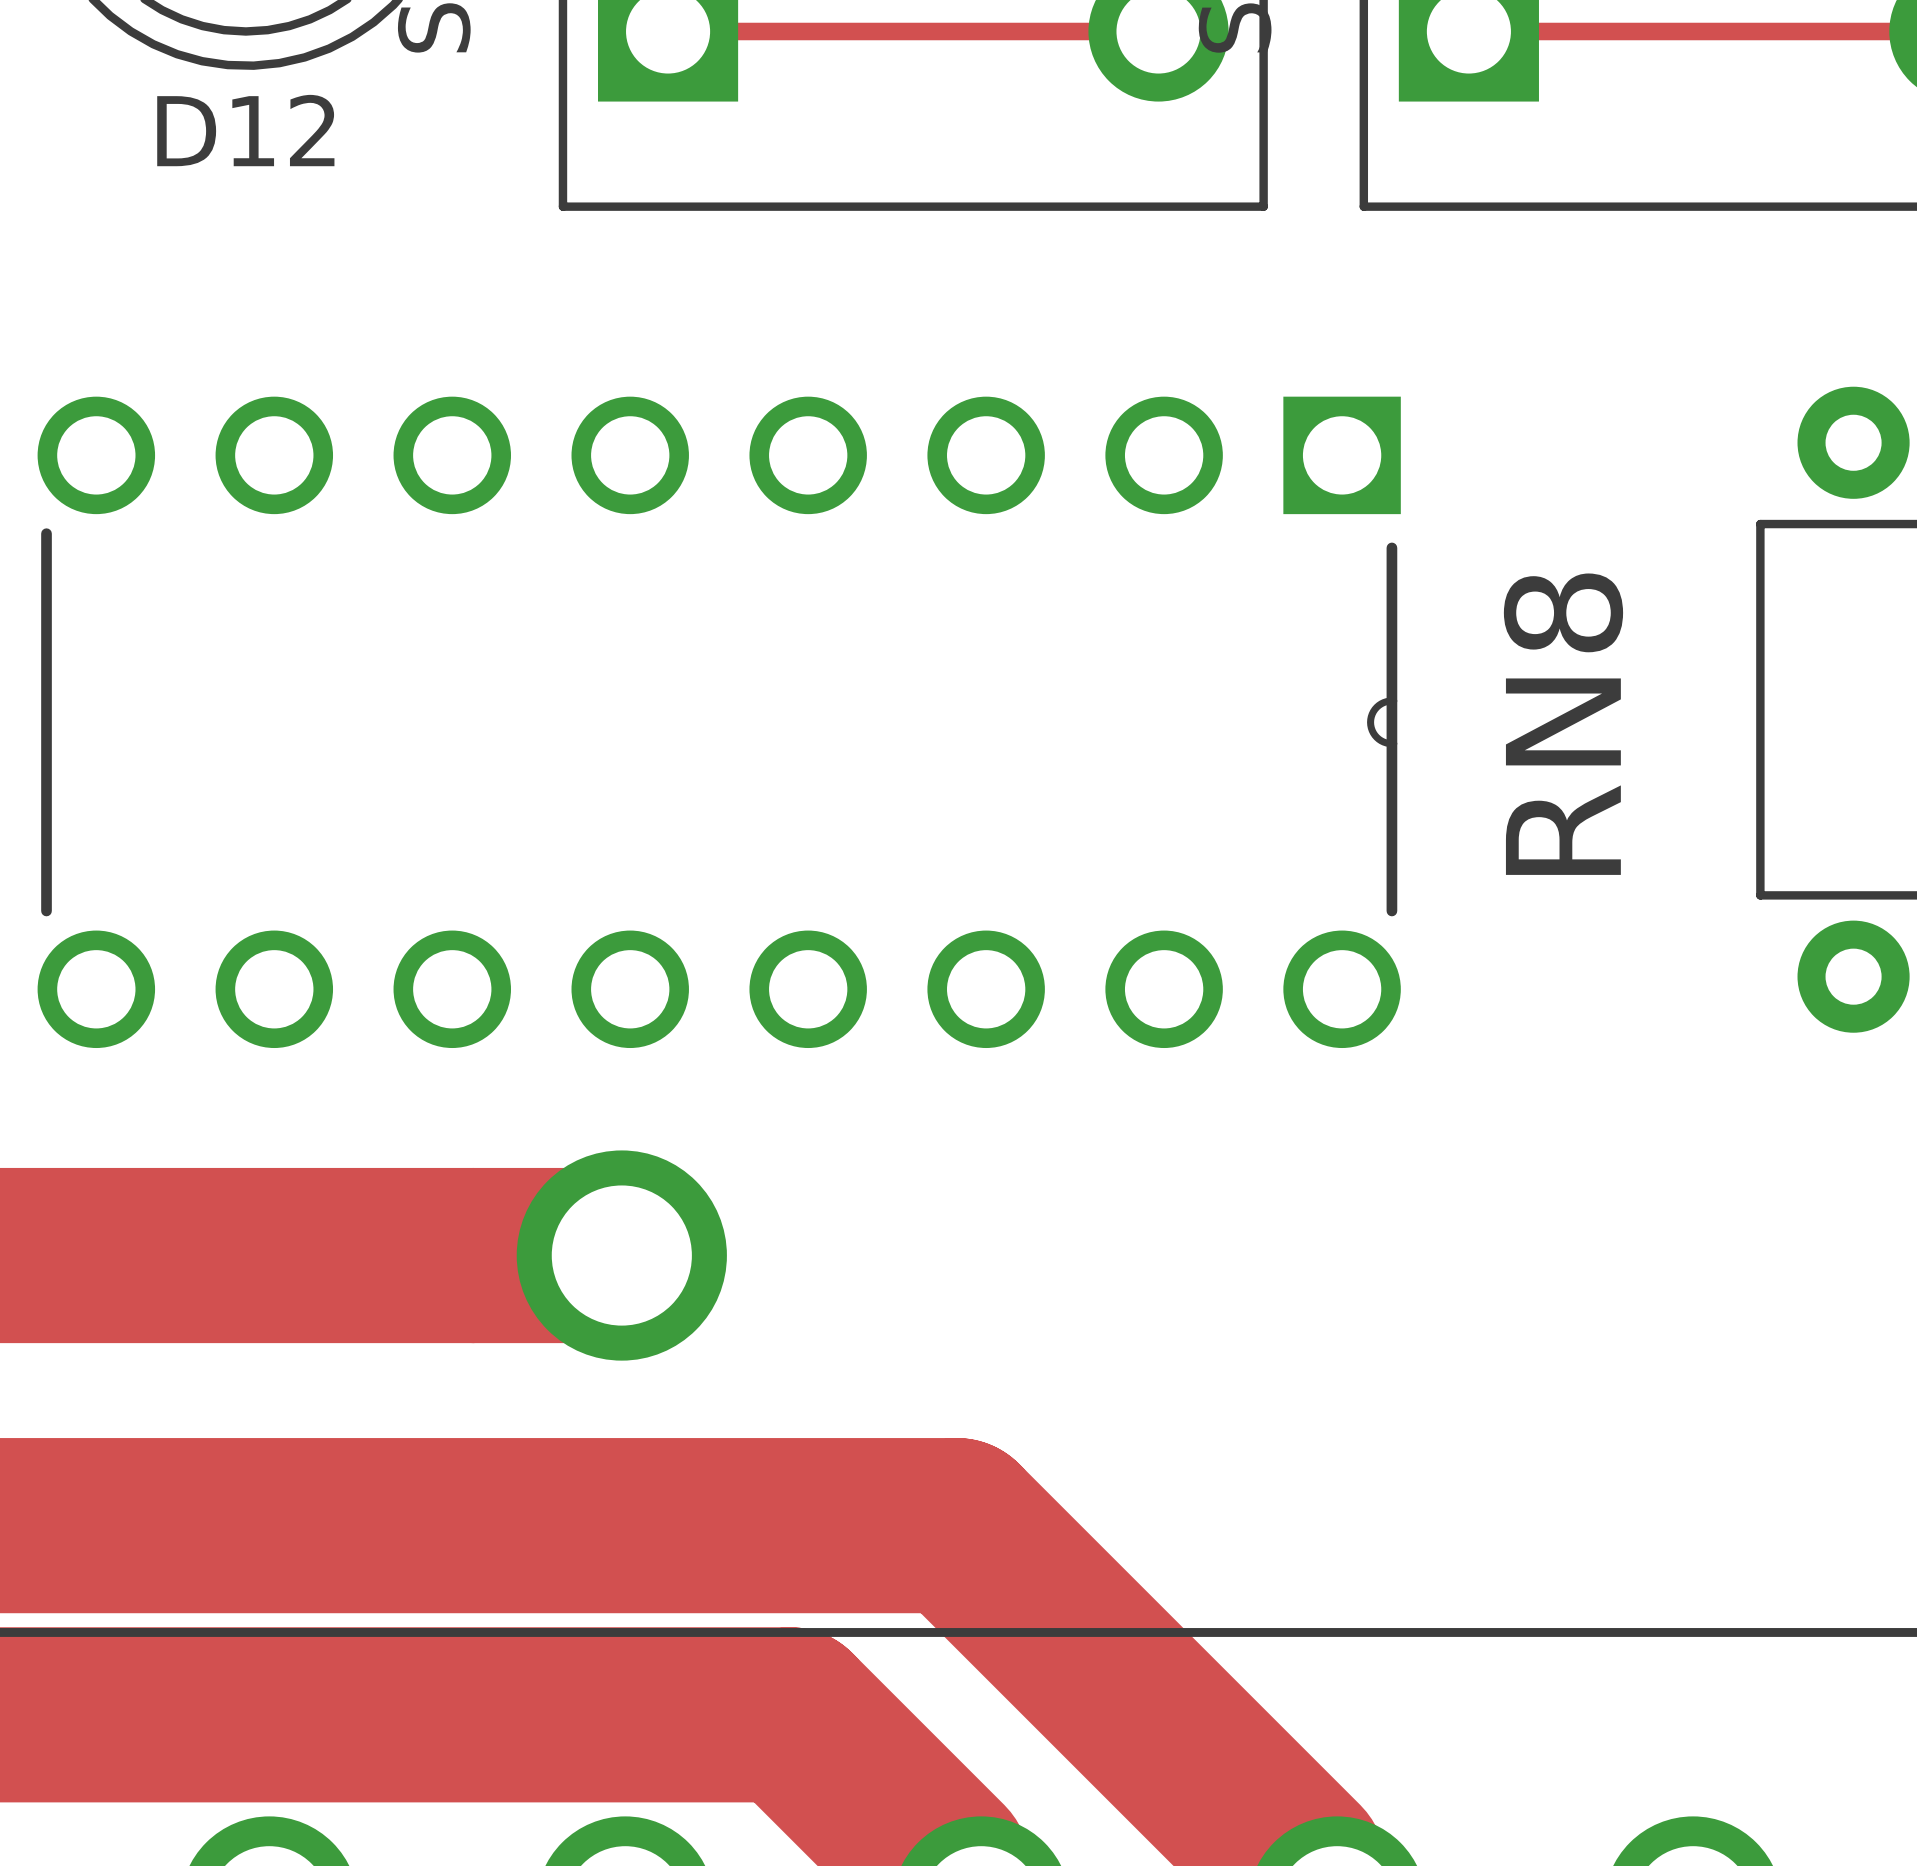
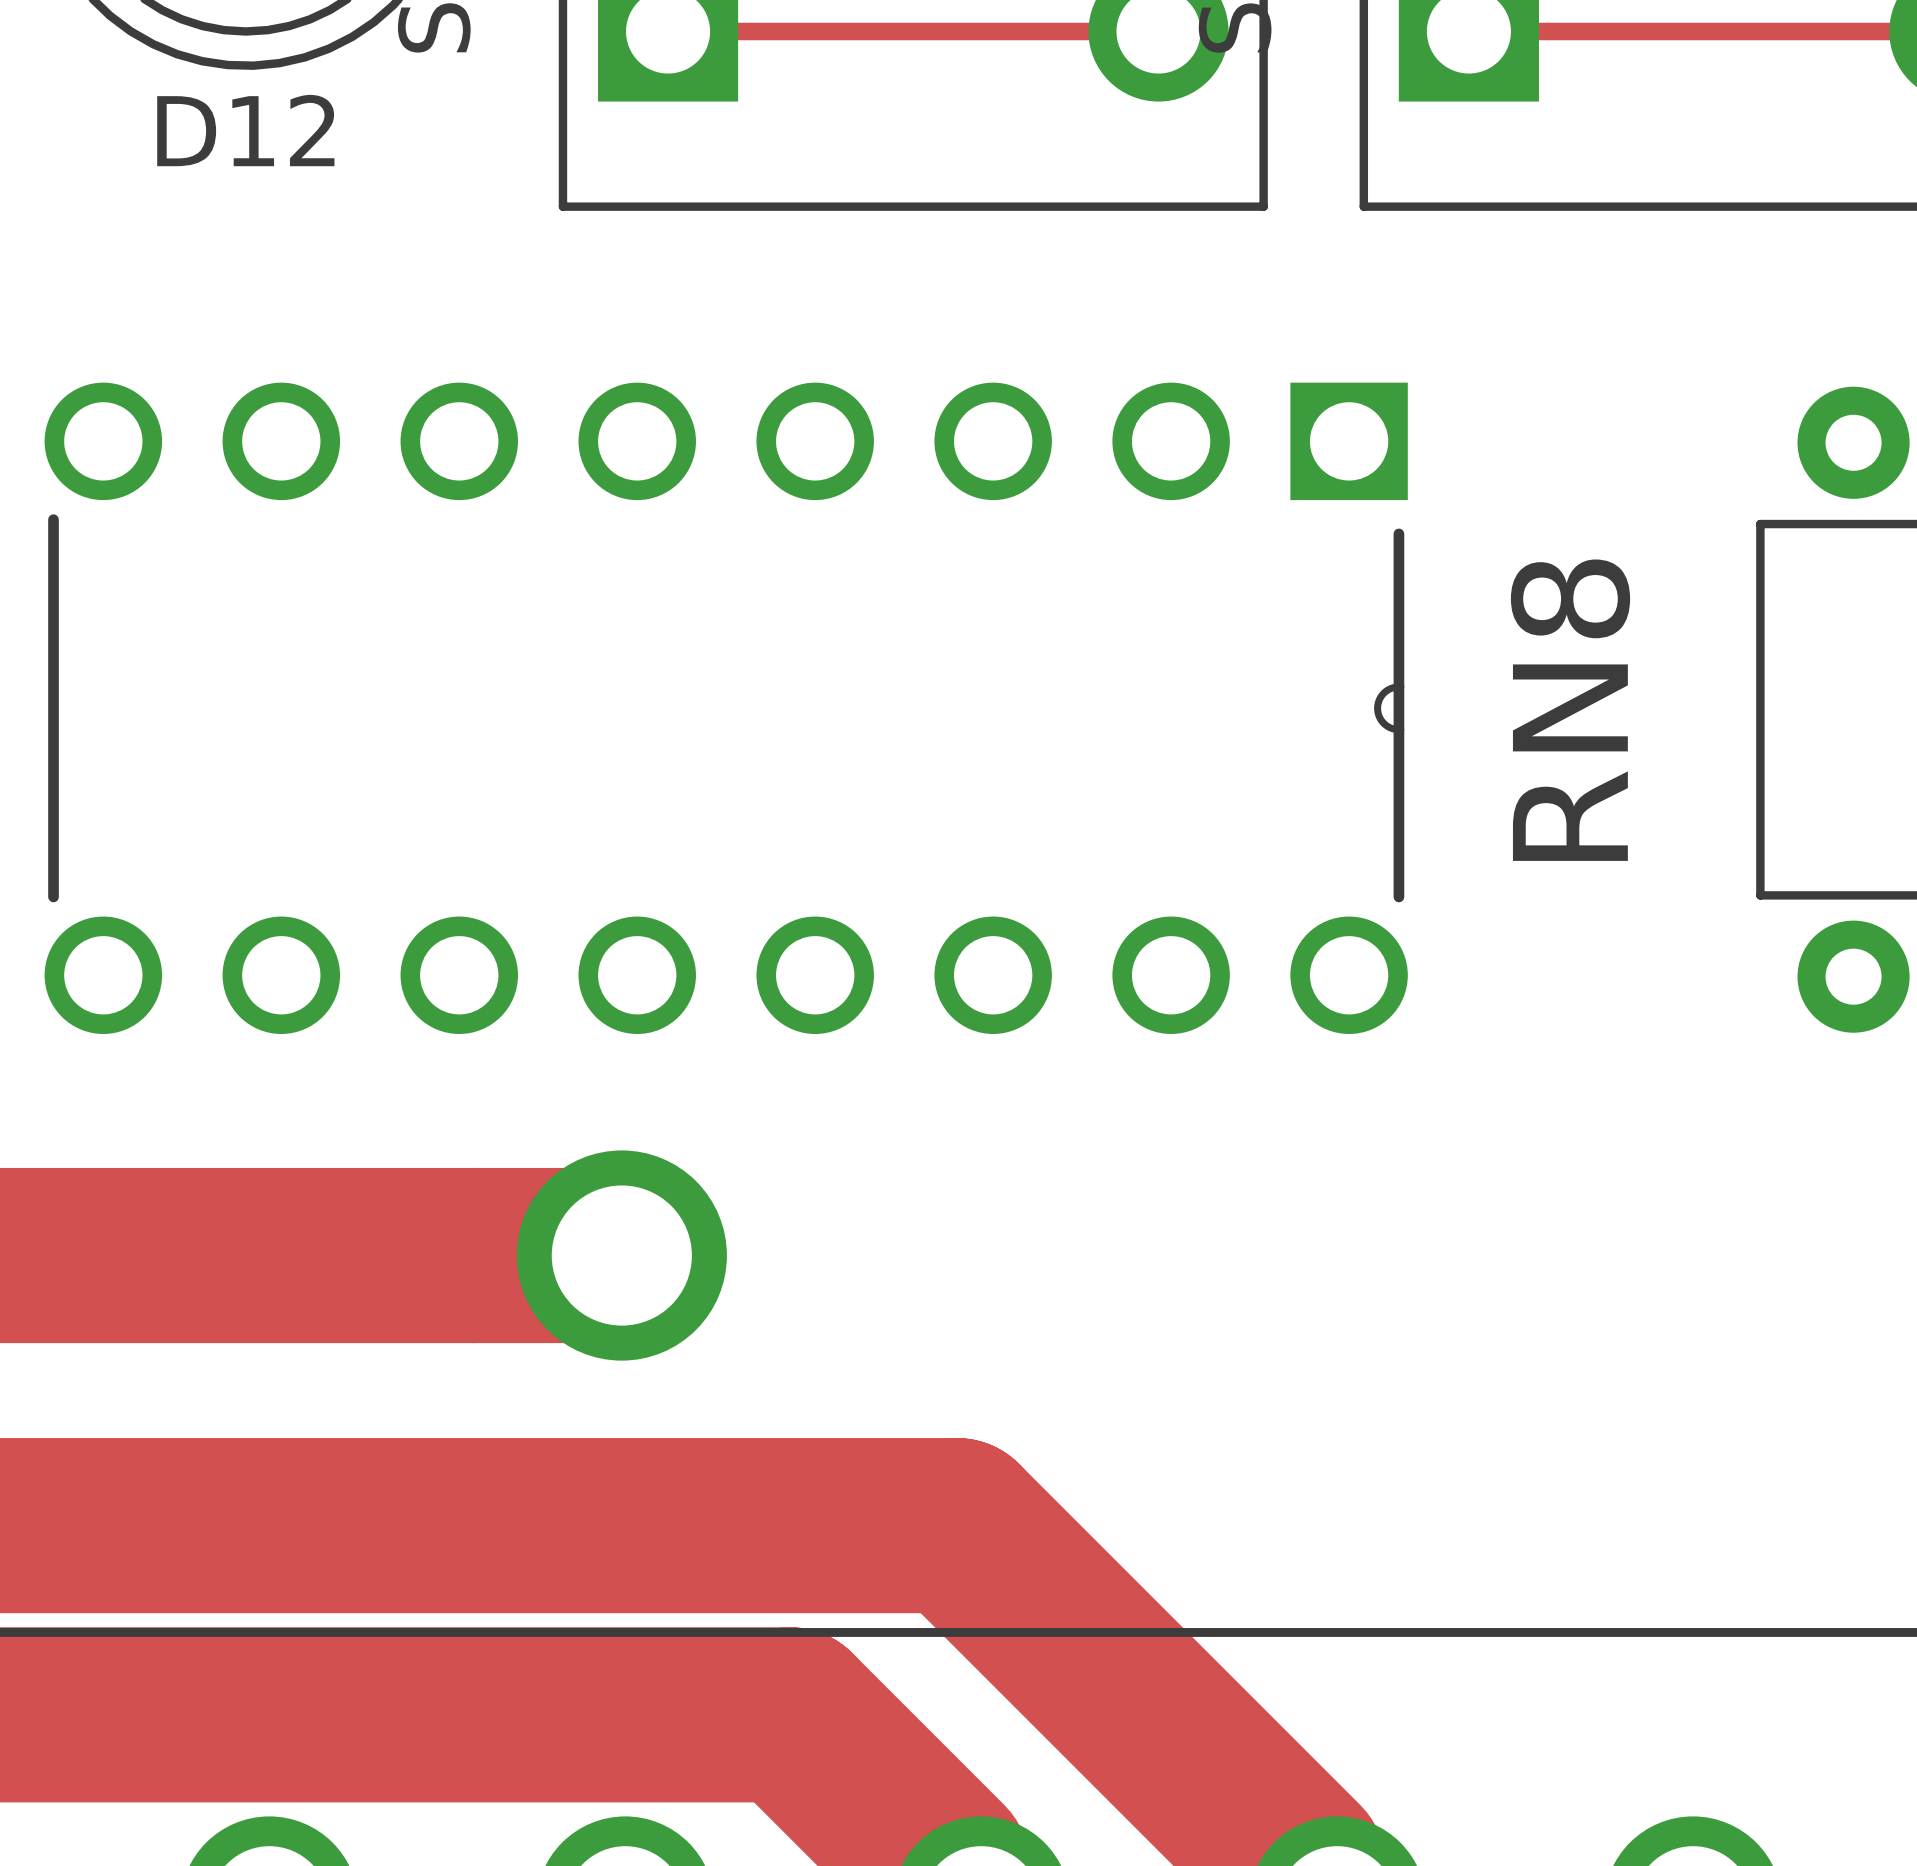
RN8 position: (719, 722) -> (726, 708)

